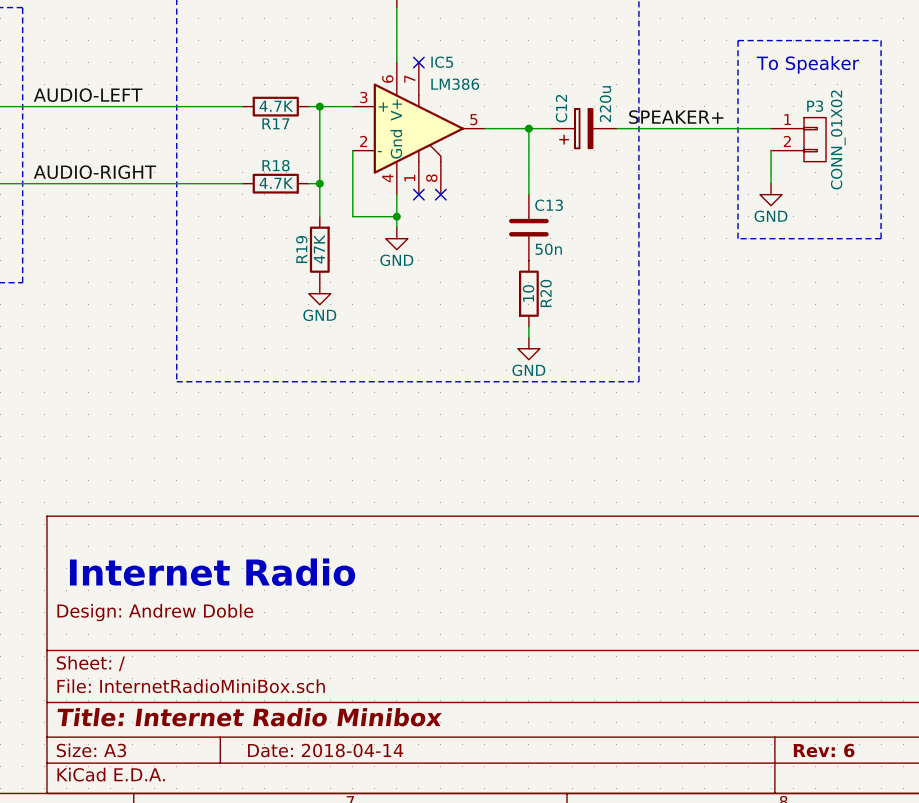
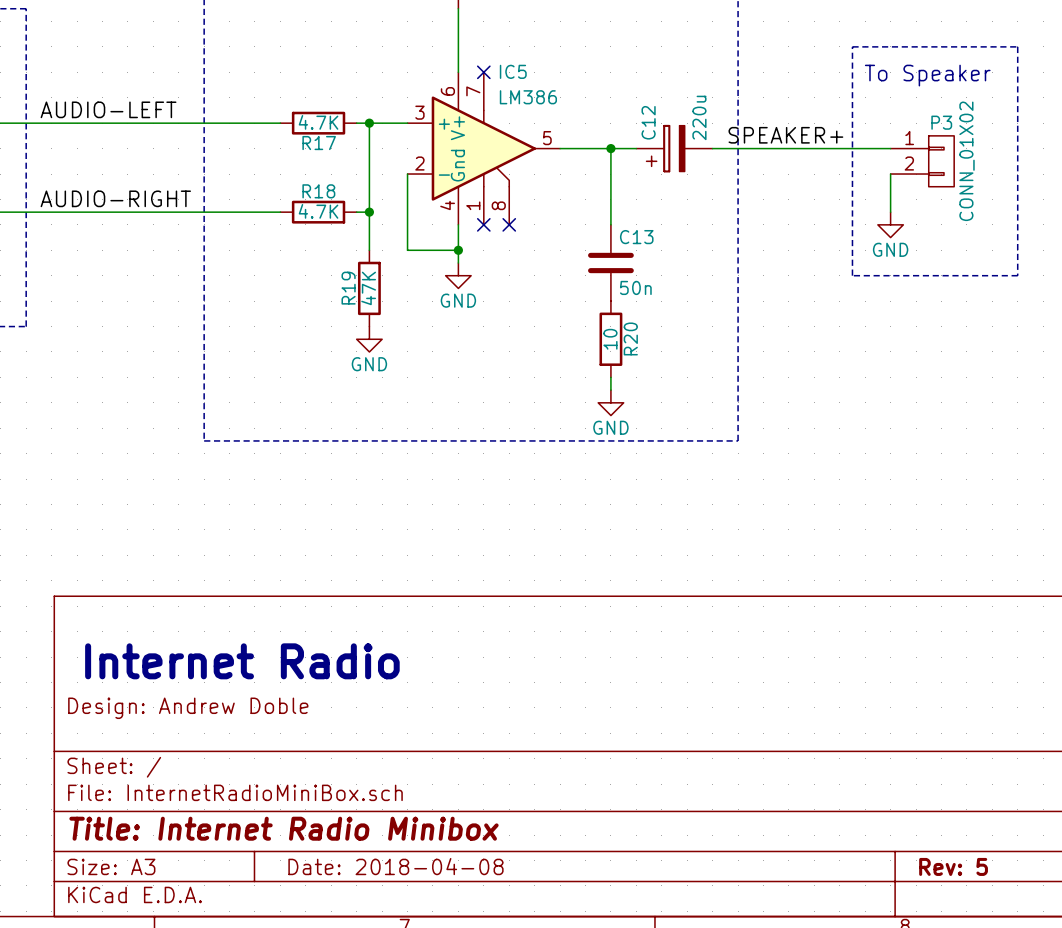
title block: Date: 2018-04-14 (325, 750) -> Date: 2018-04-08 (395, 866)
title block: Rev: 6 (824, 750) -> Rev: 5 (953, 866)

